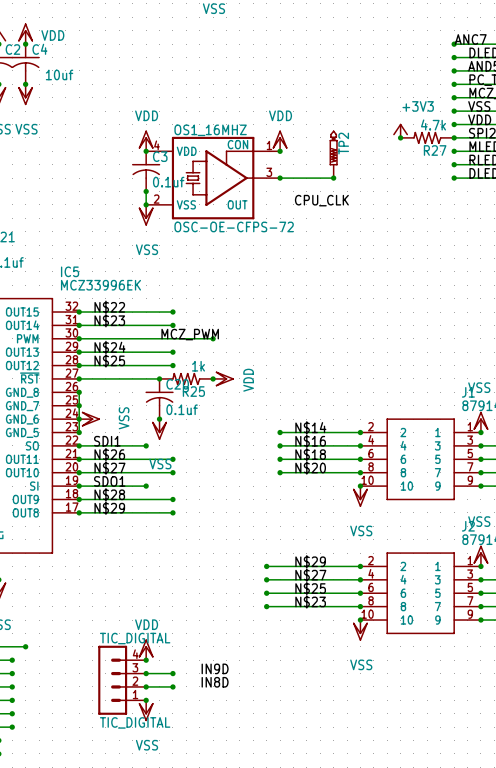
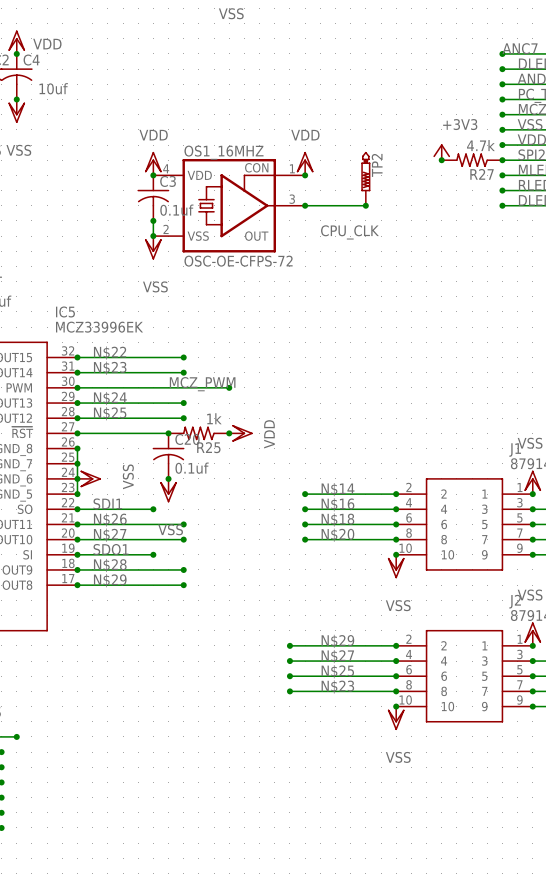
power symbol: VDD (146, 649) -> none
junction: (146, 660) -> none
label: IN9D (215, 668) -> none
wire: (146, 673) (172, 673) -> none
junction: (146, 673) -> none
junction: (172, 673) -> none
TIC_DIGITAL: TIC_DIGITAL (122, 680) -> none
label: IN8D (215, 682) -> none
wire: (146, 686) (172, 686) -> none
junction: (146, 686) -> none
junction: (172, 686) -> none
junction: (146, 700) -> none
power symbol: VSS (146, 710) -> none

